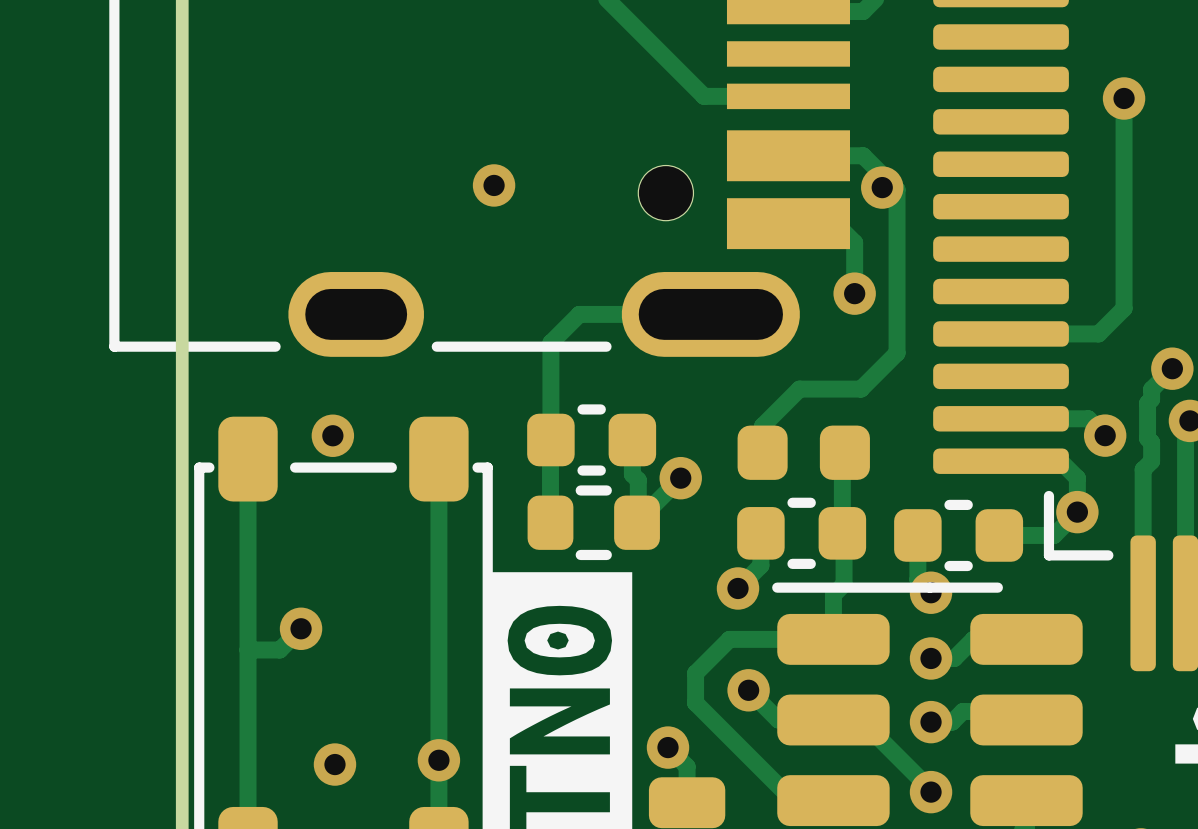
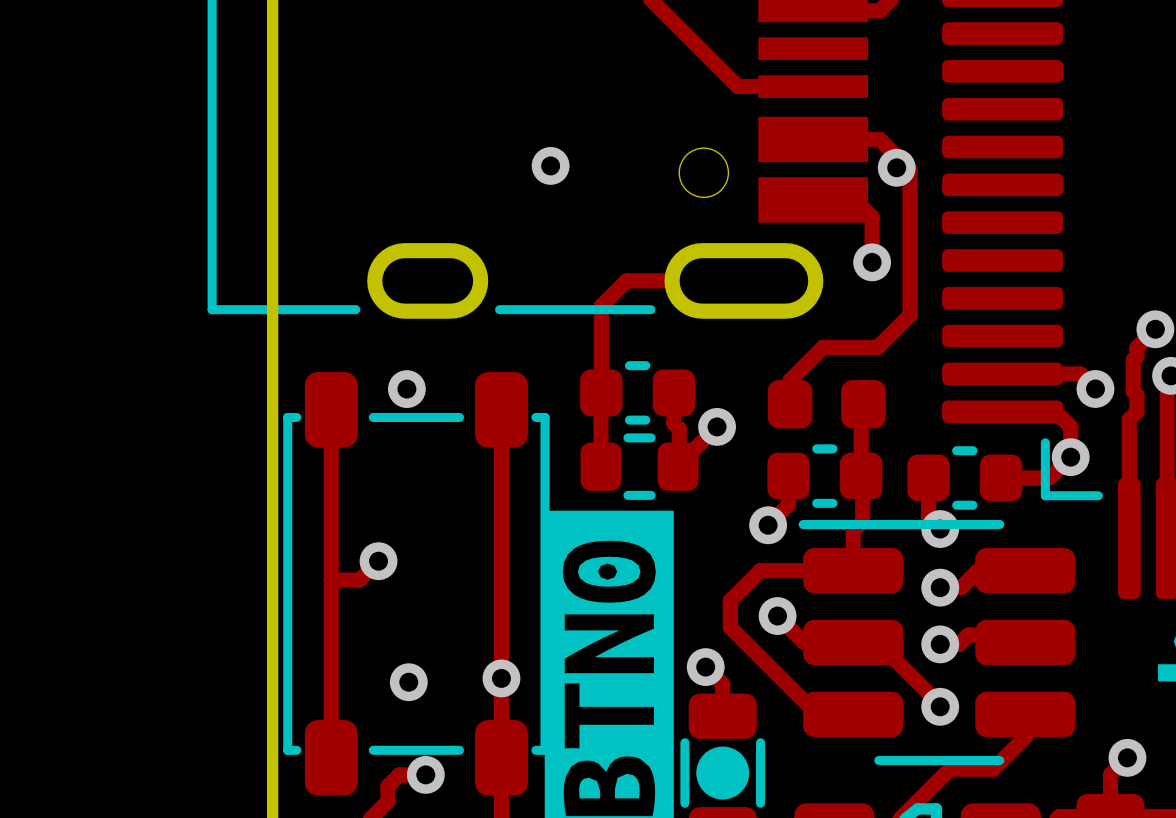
track: (1124, 98) (1124, 308) (1098, 333) (1001, 333) -> none
via: (1124, 98) -> none

